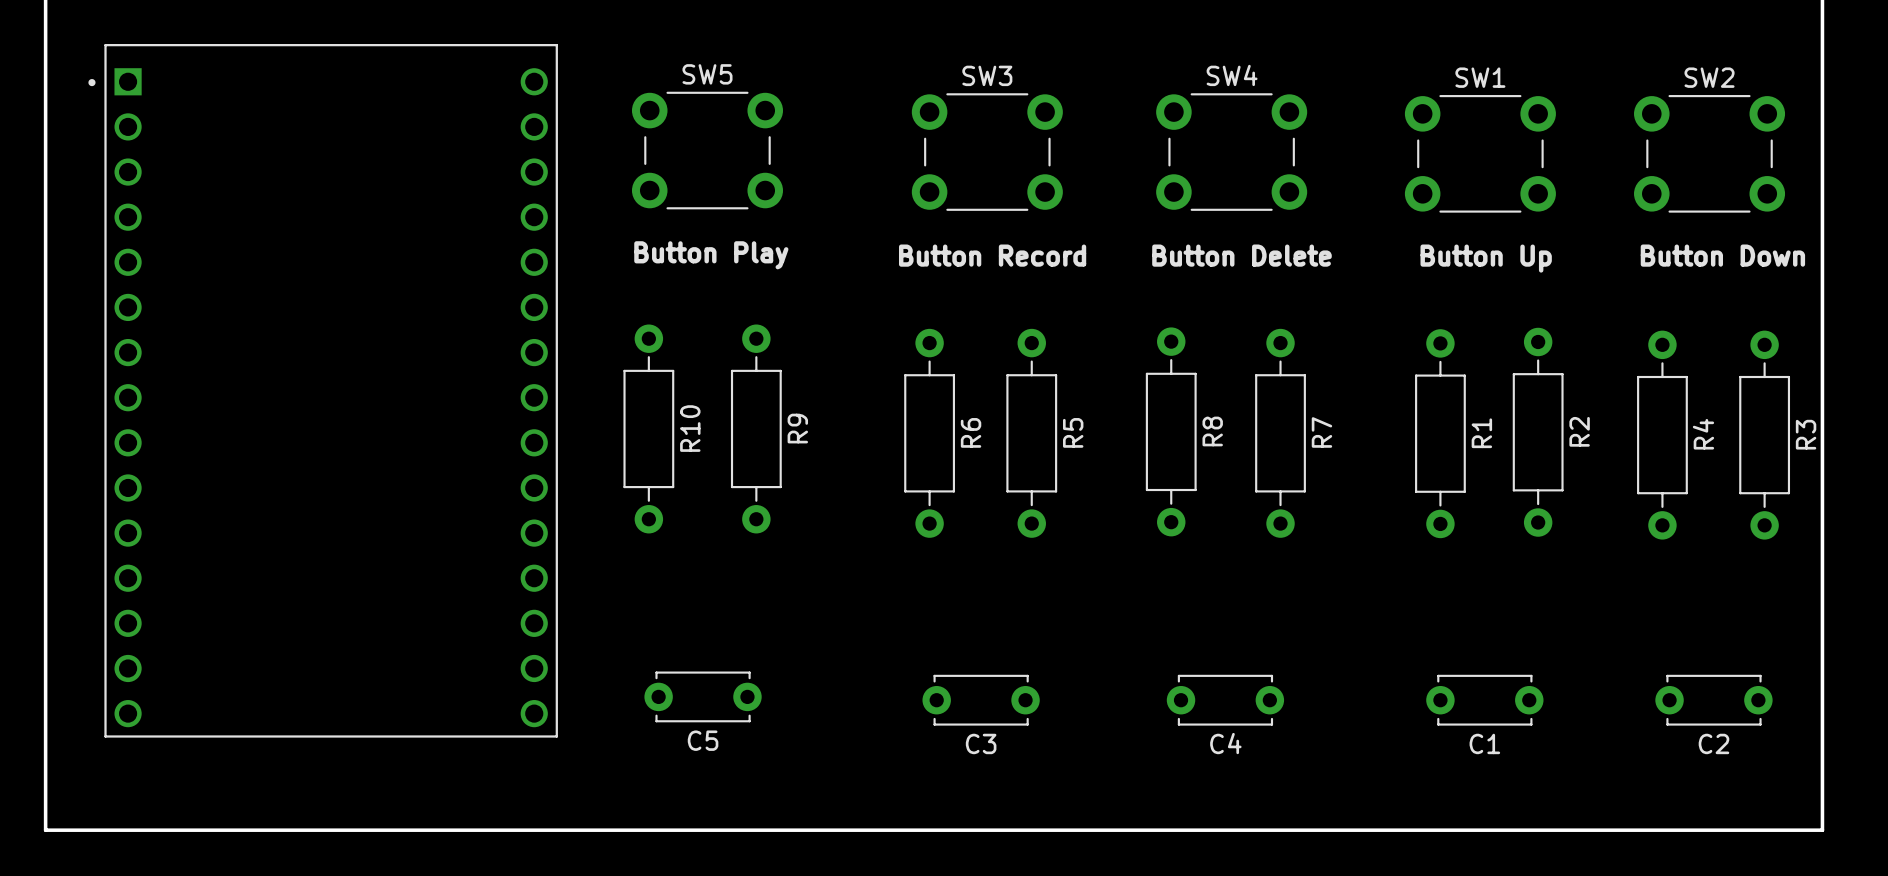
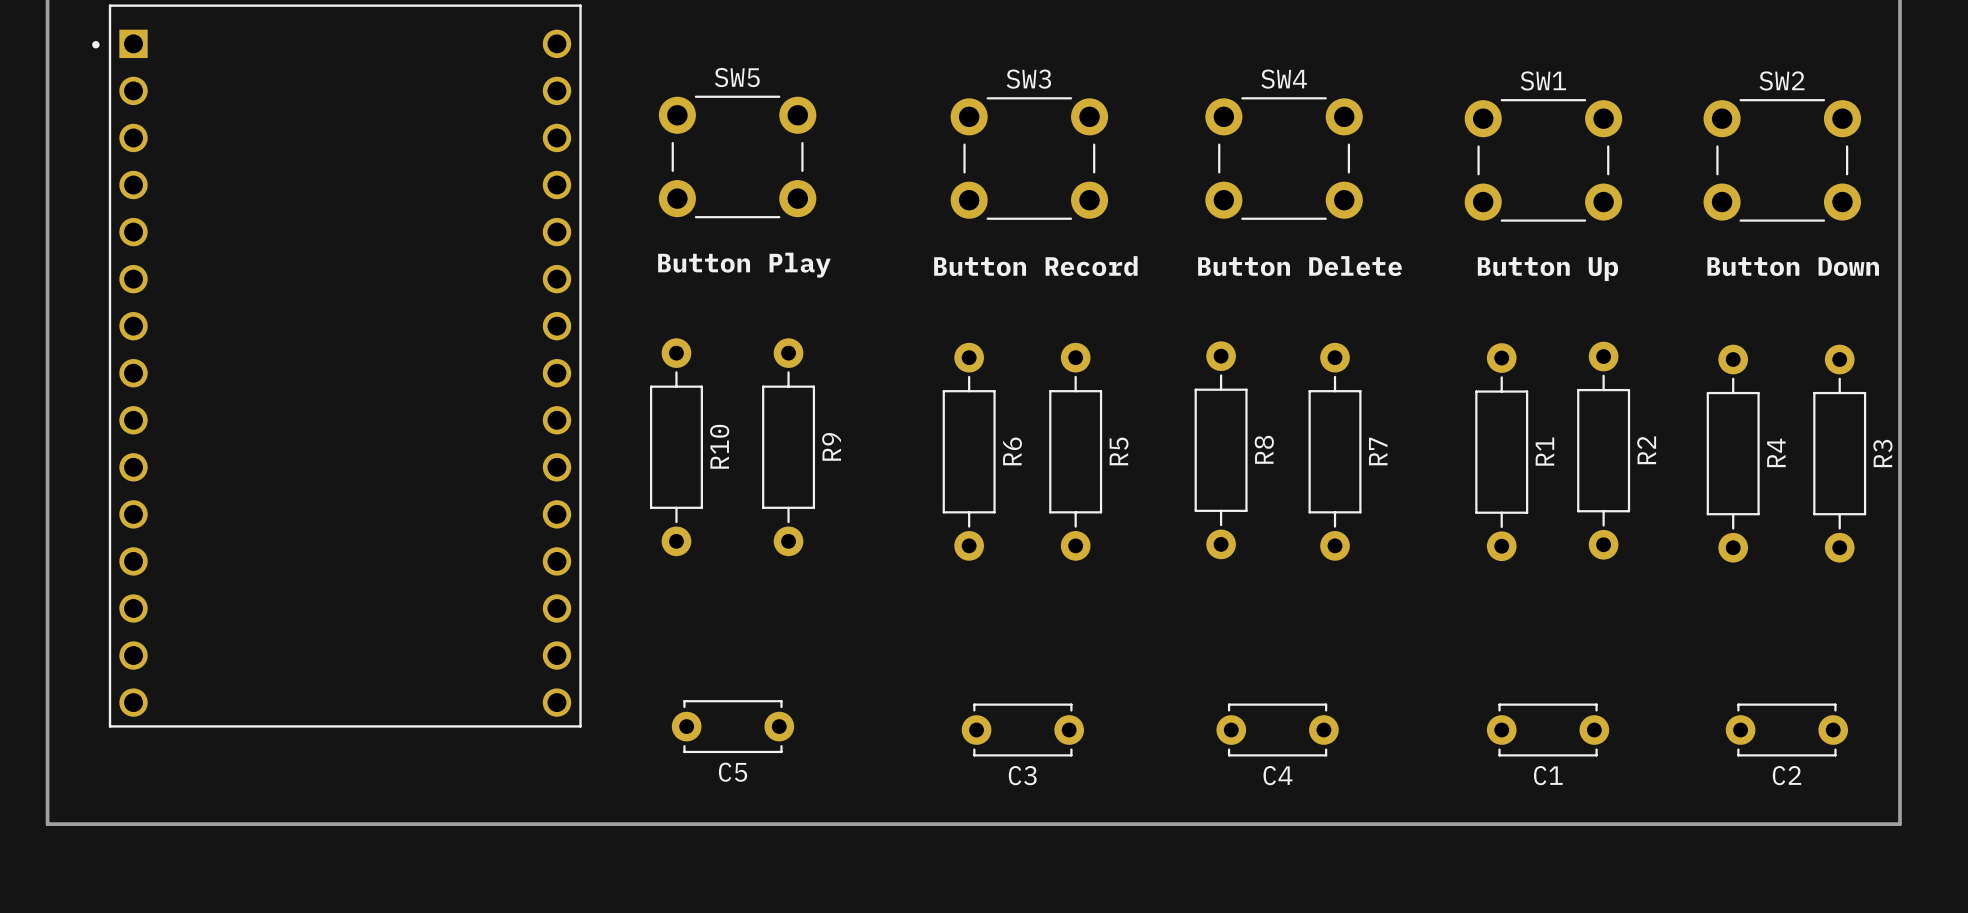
part position: (323, 390) -> (336, 366)
board edge: (45, 790) (45, 830) (1822, 830) (1822, 790) -> (47, 824) (1900, 824)

